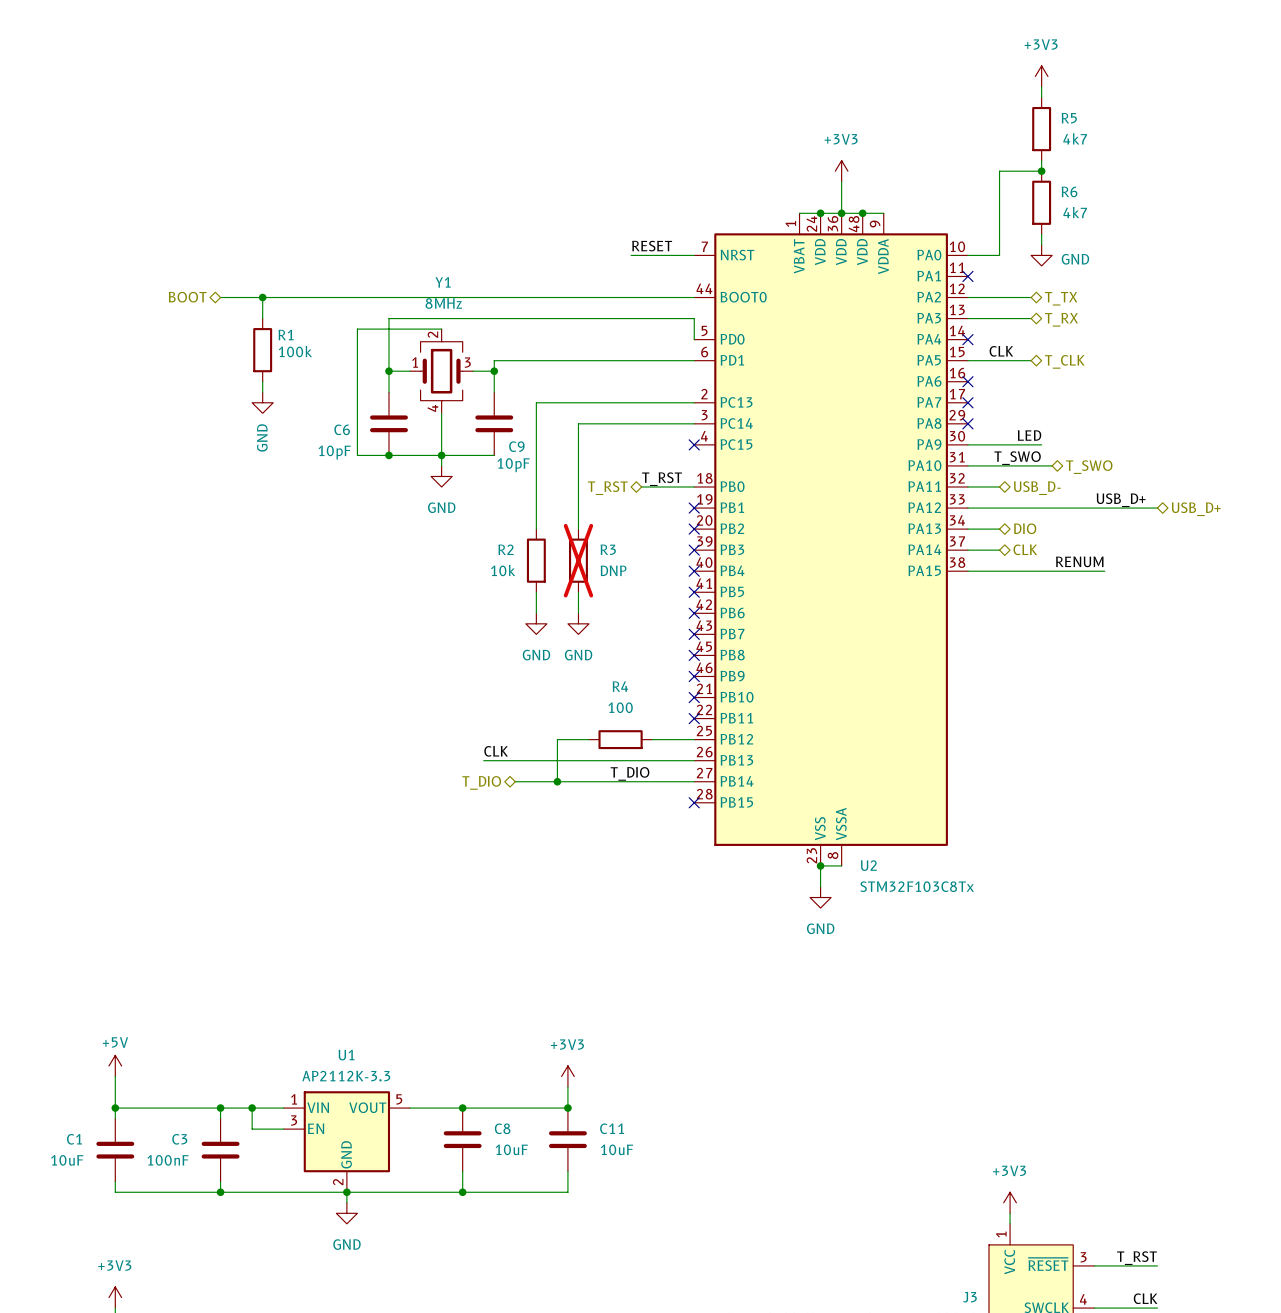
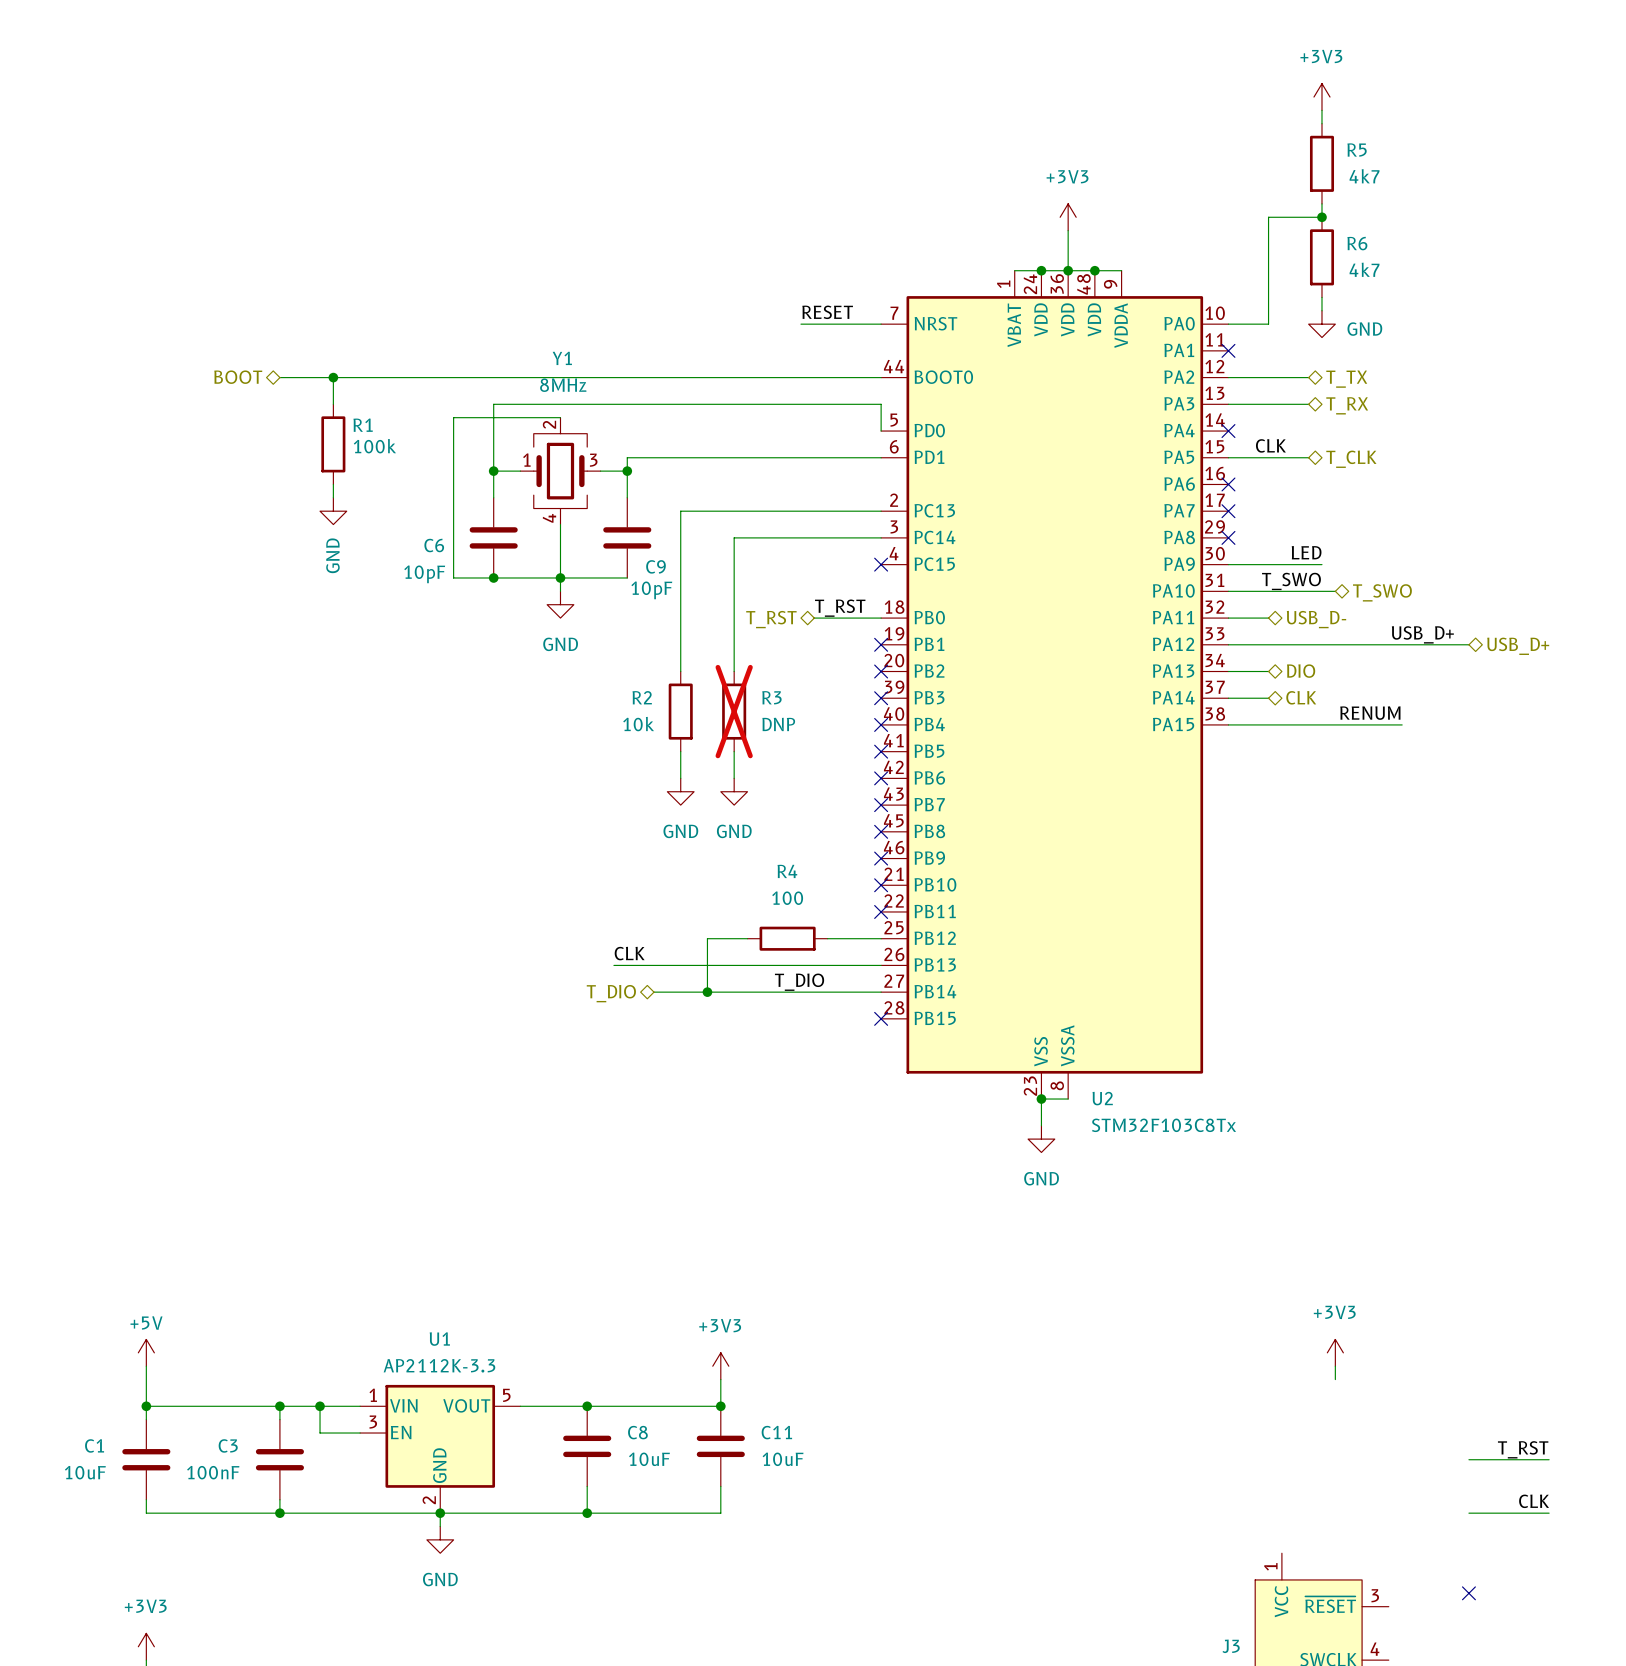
power symbol position: +3V3 (1010, 1202) -> +3V3 (1335, 1352)
wire: (1010, 1213) (1010, 1223) -> (1335, 1366) (1335, 1379)
no-connect mark: none -> (1468, 1593)
label position: T_RST (1136, 1258) -> T_RST (1523, 1449)
wire: (1094, 1265) (1157, 1265) -> (1468, 1459) (1549, 1459)
label position: CLK (1145, 1298) -> CLK (1534, 1501)
wire: (1094, 1308) (1157, 1308) -> (1468, 1513) (1549, 1513)

